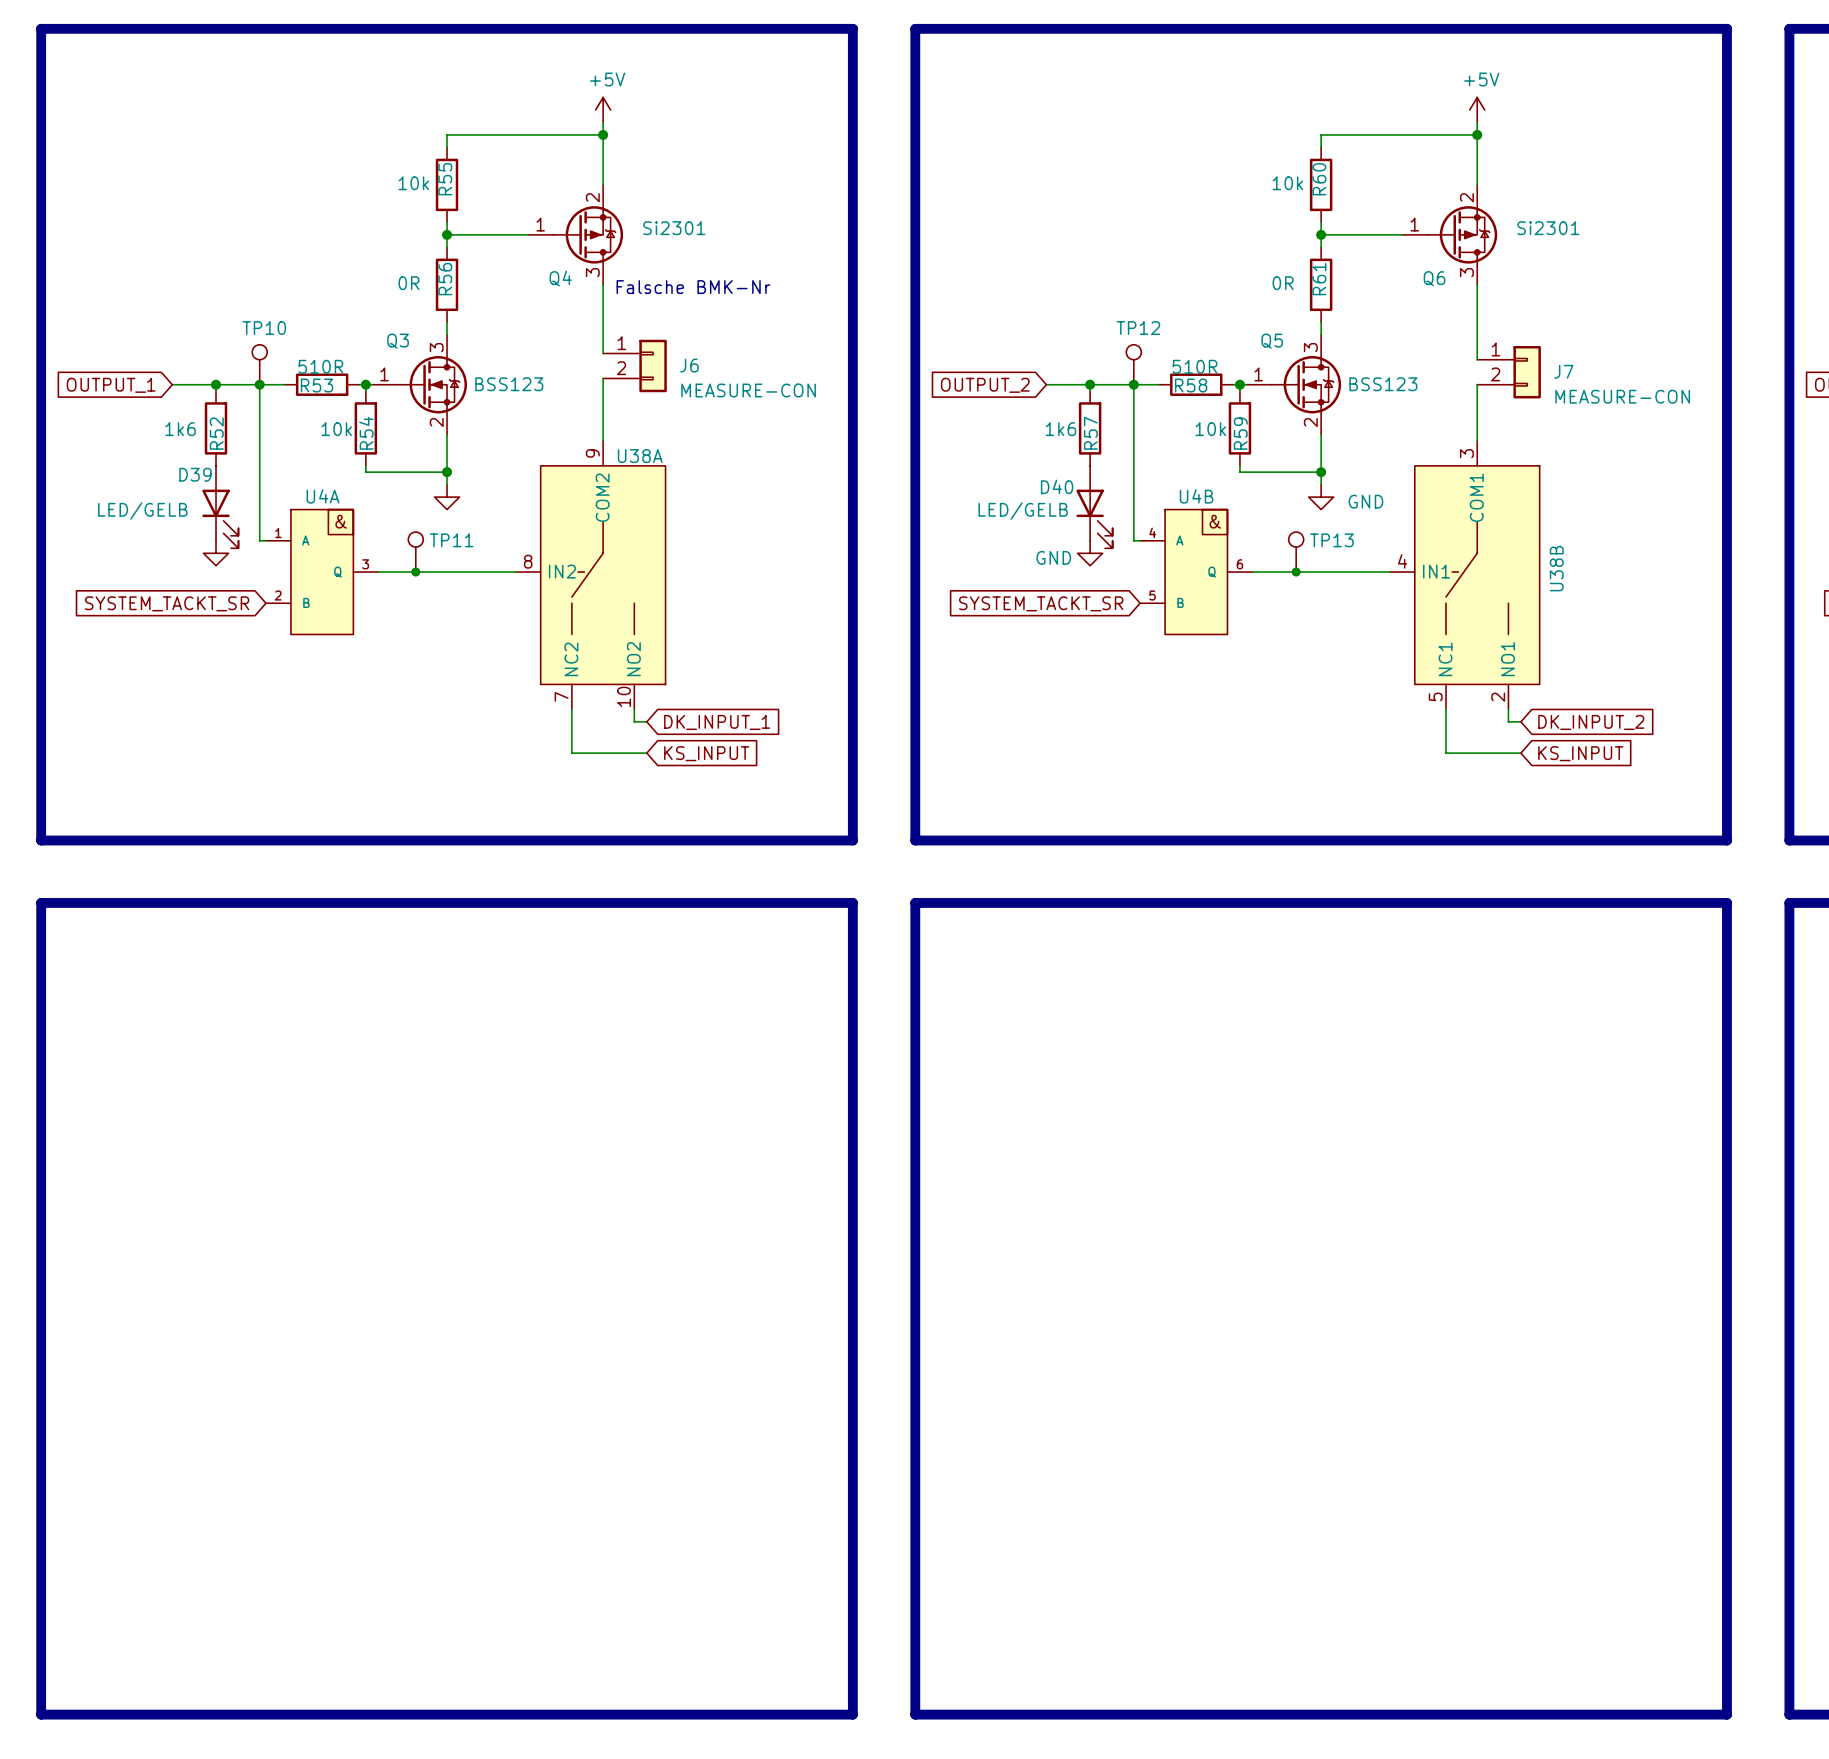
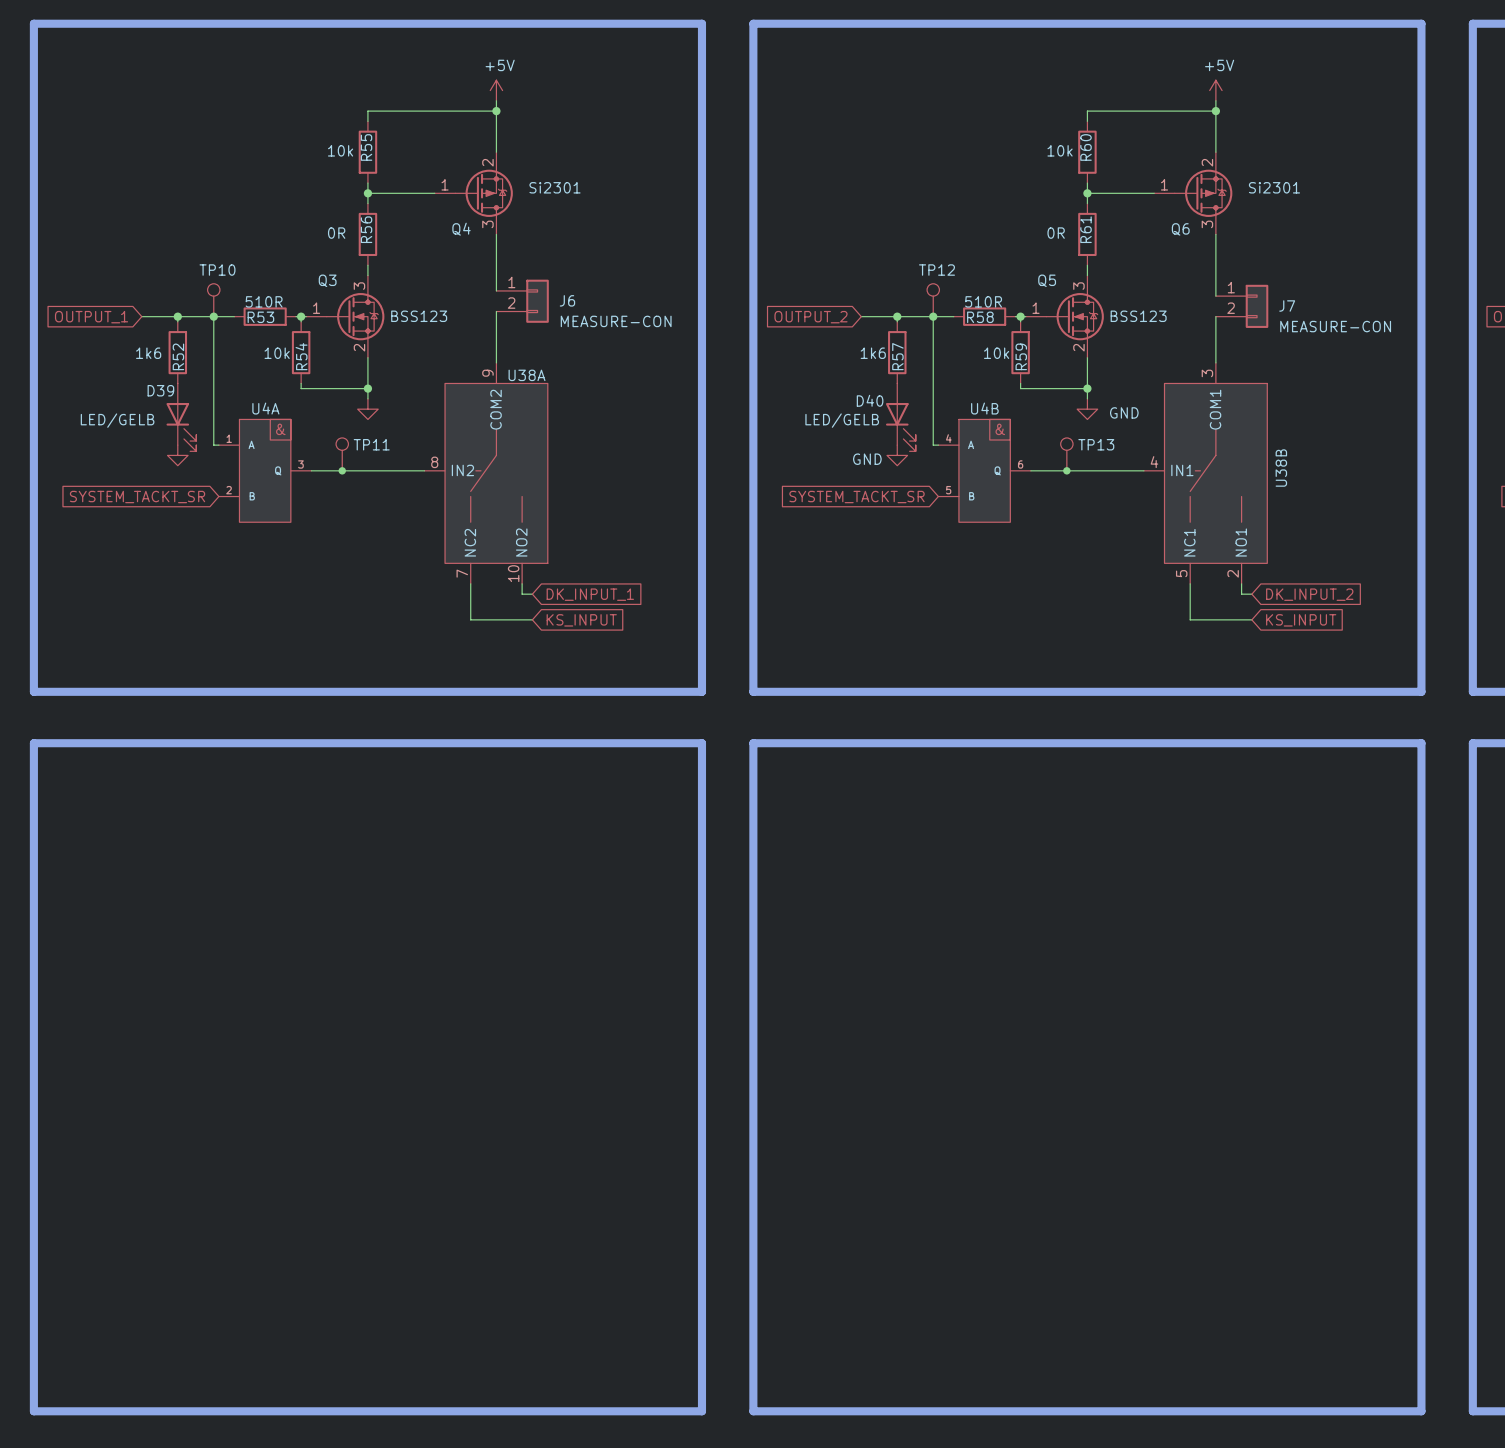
text: Falsche BMK-Nr (693, 287) -> none

